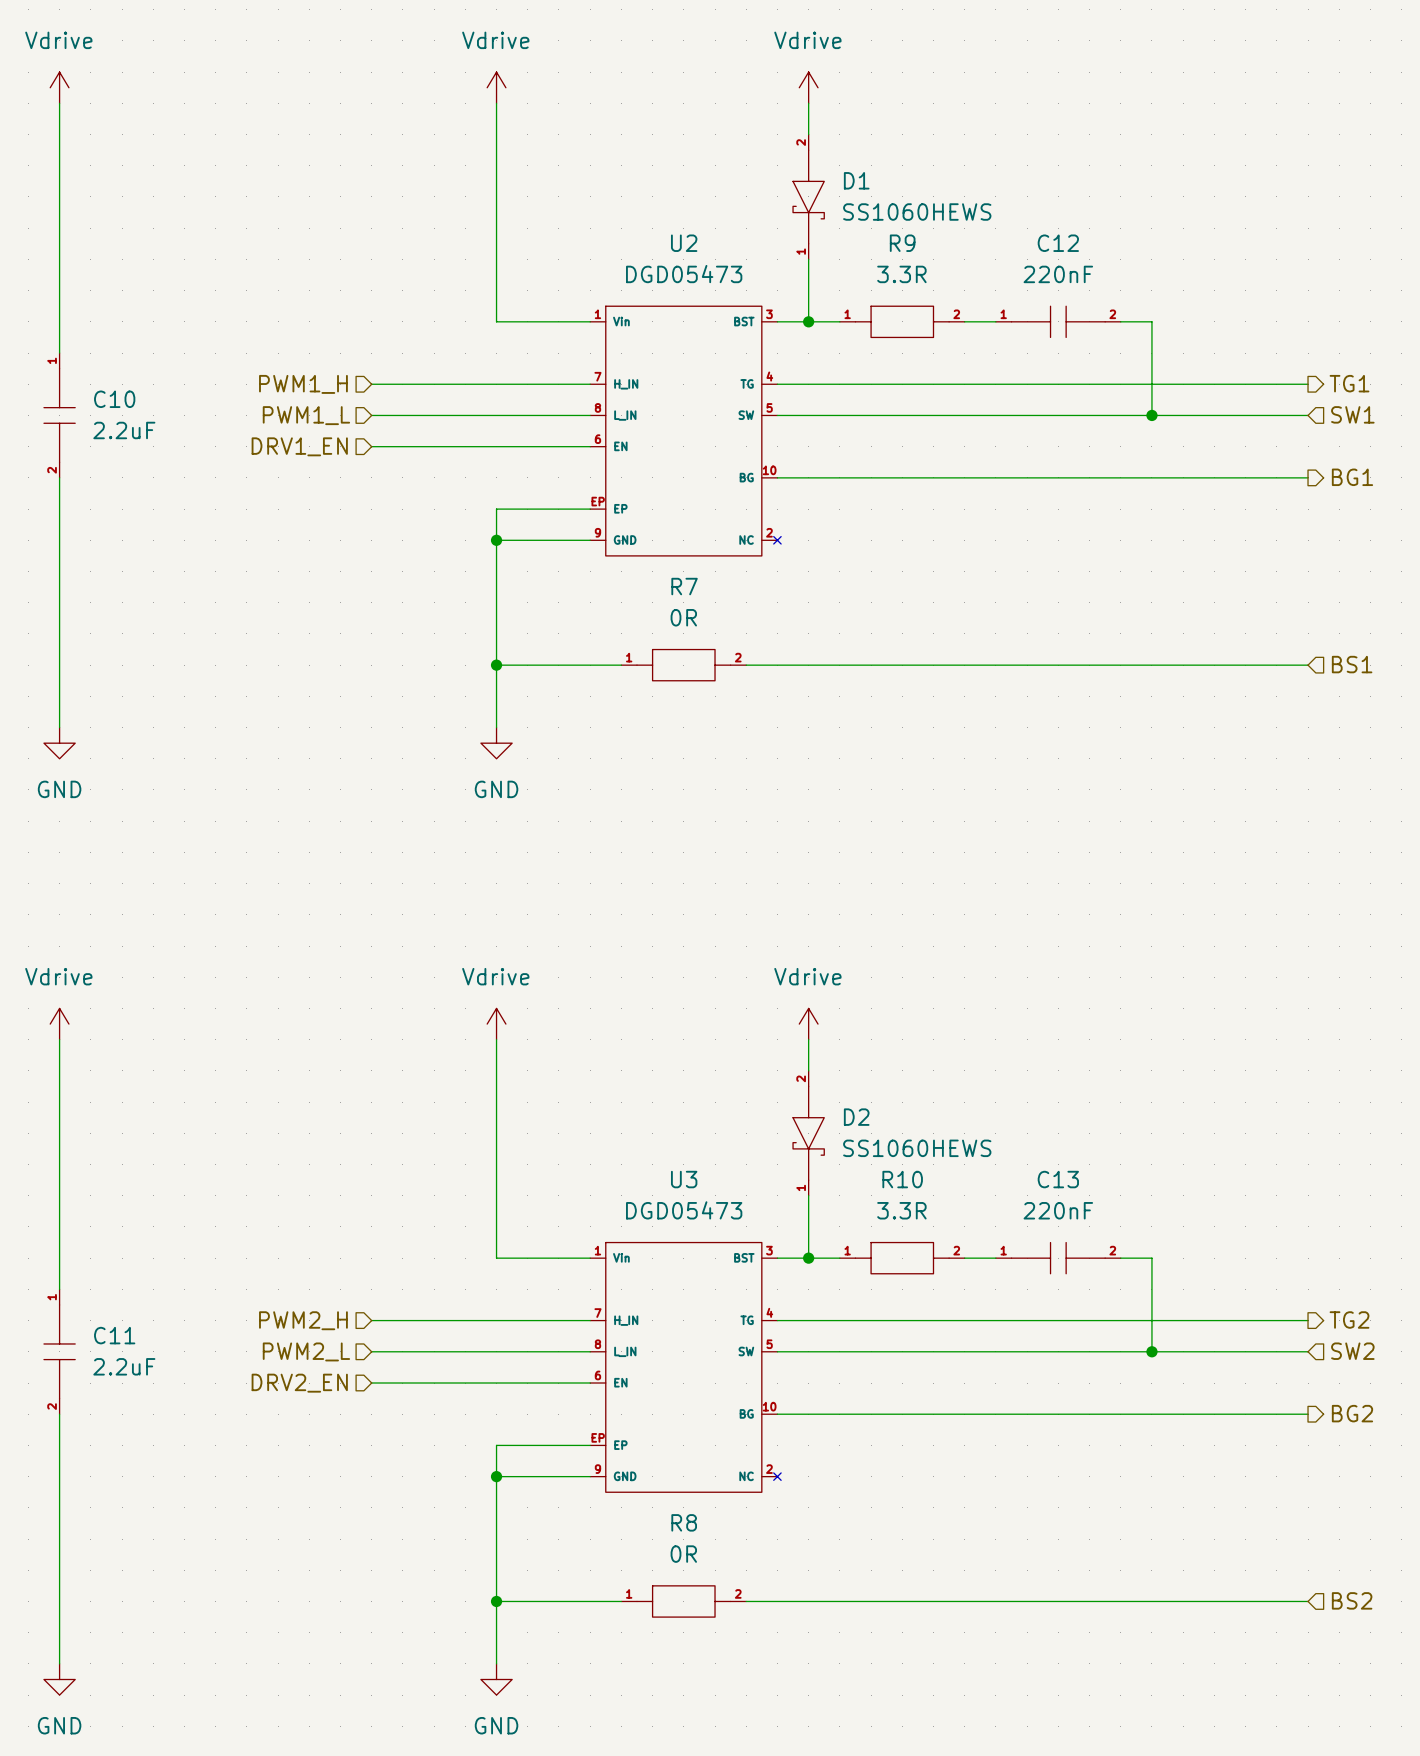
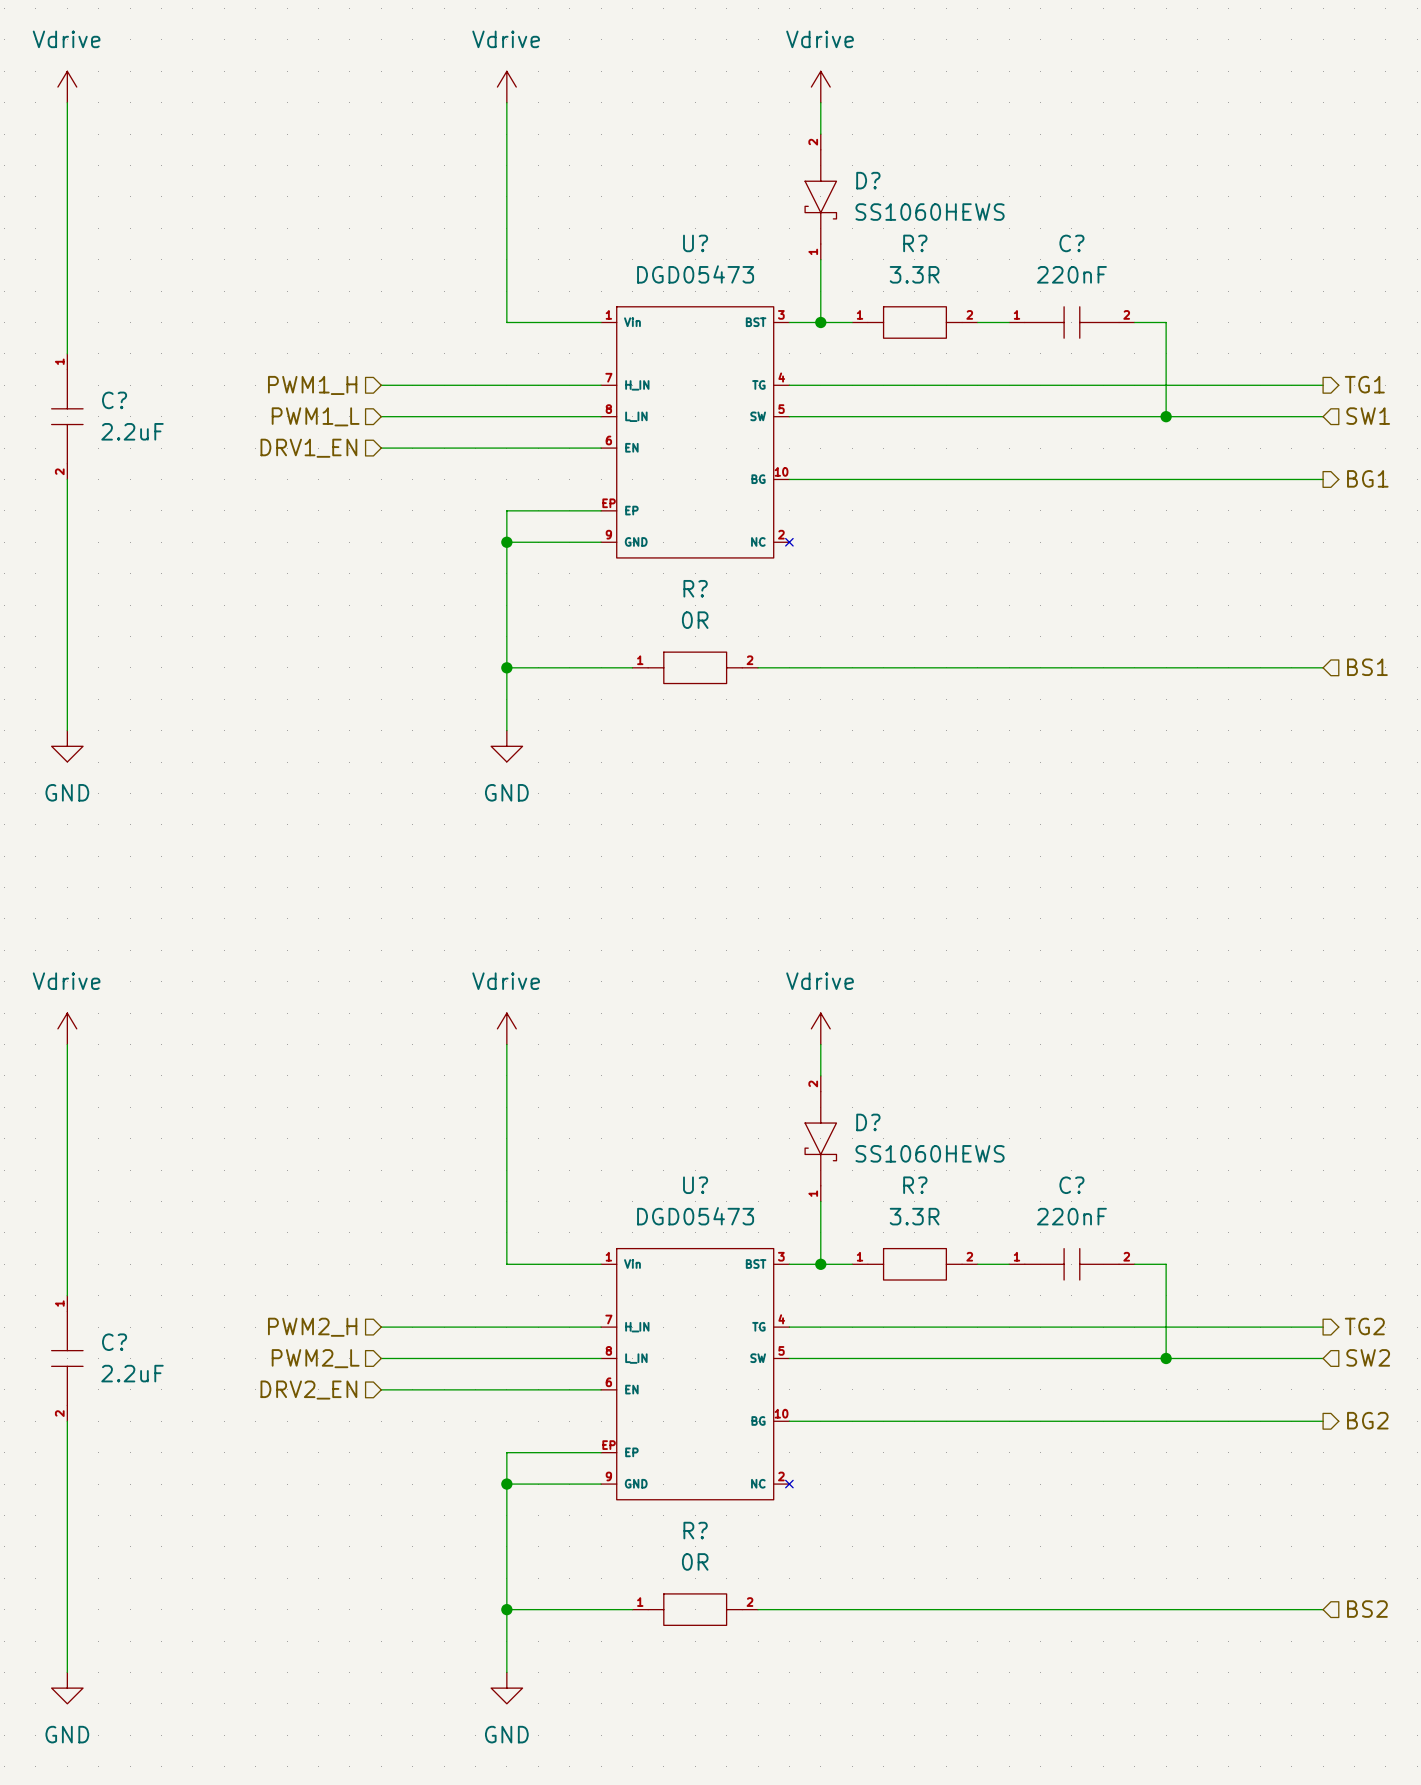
D1 name: D1 (856, 180) -> D? (868, 180)
U2 name: U2 (684, 243) -> U? (695, 243)
R9 name: R9 (902, 243) -> R? (915, 243)
C12 name: C12 (1058, 243) -> C? (1071, 243)
C10 name: C10 (114, 399) -> C? (114, 400)
R7 name: R7 (684, 586) -> R? (695, 588)
D2 name: D2 (856, 1117) -> D? (868, 1122)
U3 name: U3 (684, 1179) -> U? (695, 1185)
R10 name: R10 (902, 1179) -> R? (915, 1185)
C13 name: C13 (1058, 1179) -> C? (1071, 1185)
C11 name: C11 (114, 1335) -> C? (114, 1342)
R8 name: R8 (684, 1522) -> R? (695, 1530)

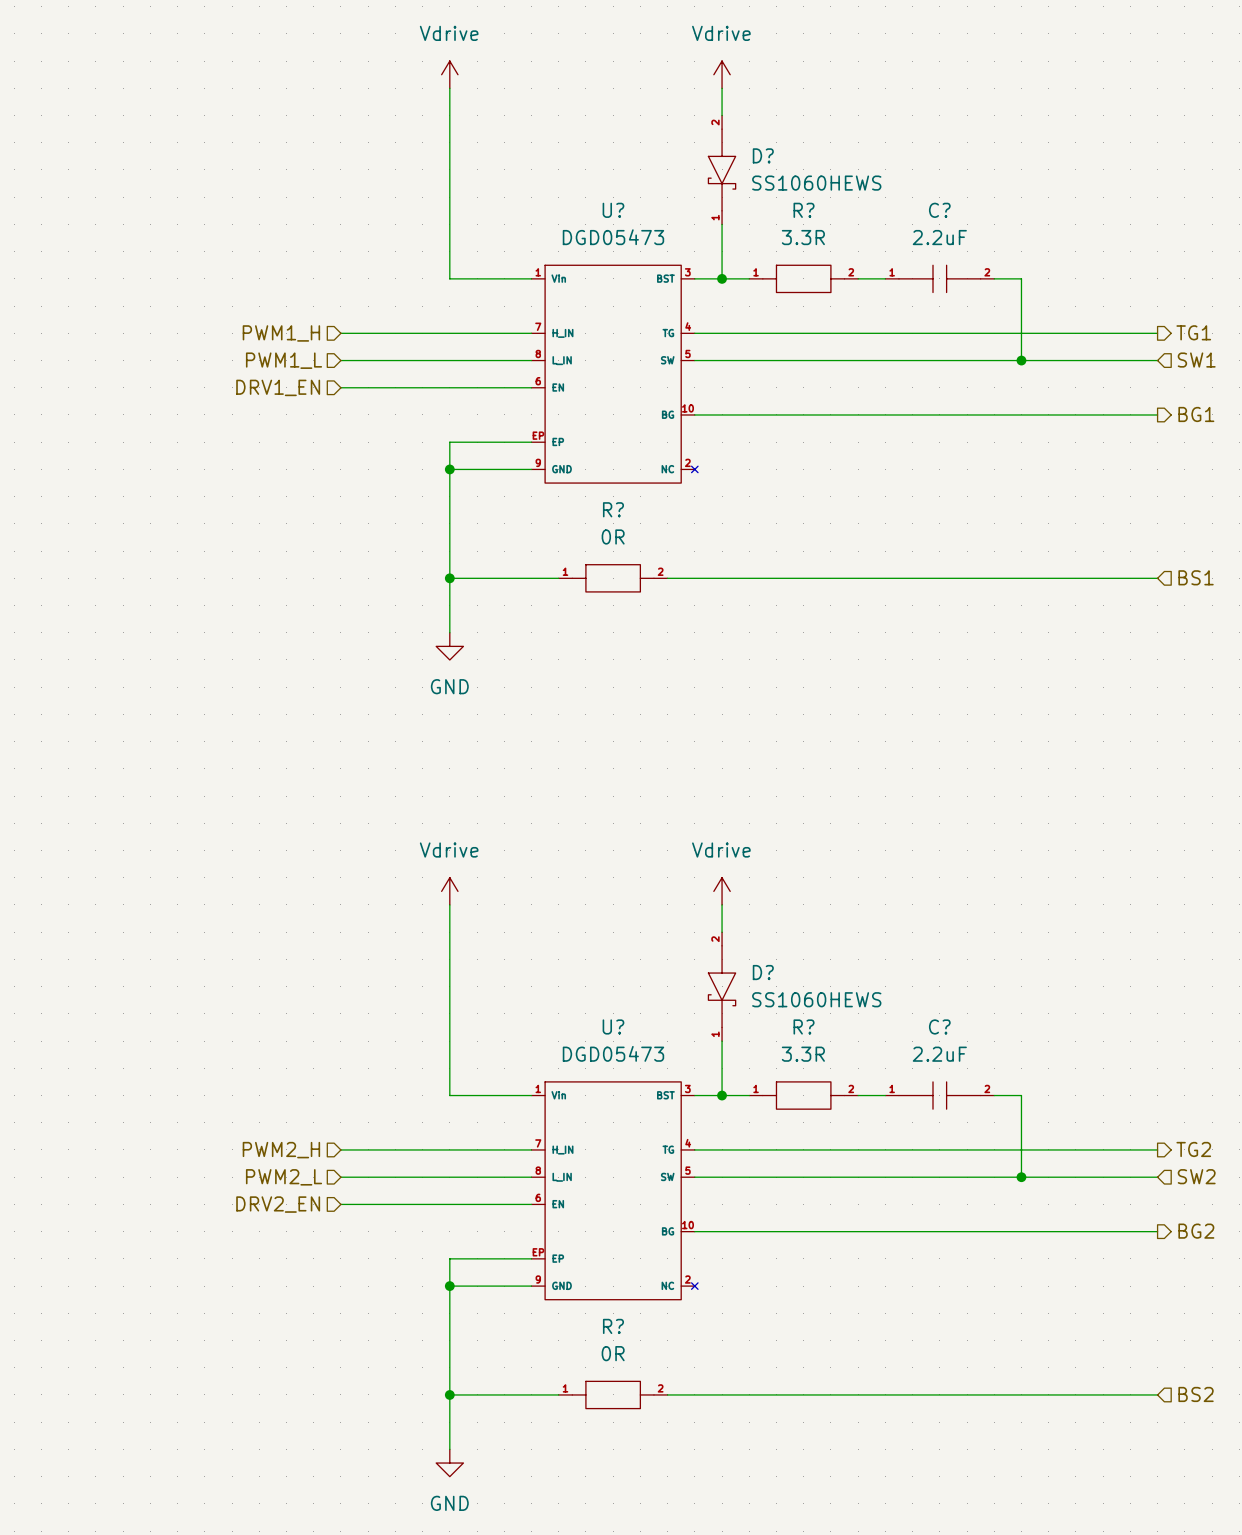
power symbol: Vdrive (67, 87) -> none
wire: (67, 102) (67, 353) -> none
C? value: 220nF (1071, 274) -> 2.2uF (939, 237)
C?: 2.2uF (67, 416) -> none
wire: (67, 479) (67, 730) -> none
power symbol: GND (67, 746) -> none
power symbol: Vdrive (67, 1028) -> none
wire: (67, 1044) (67, 1295) -> none
C? value: 220nF (1071, 1216) -> 2.2uF (939, 1054)
C?: 2.2uF (67, 1358) -> none
wire: (67, 1421) (67, 1672) -> none
power symbol: GND (67, 1688) -> none

